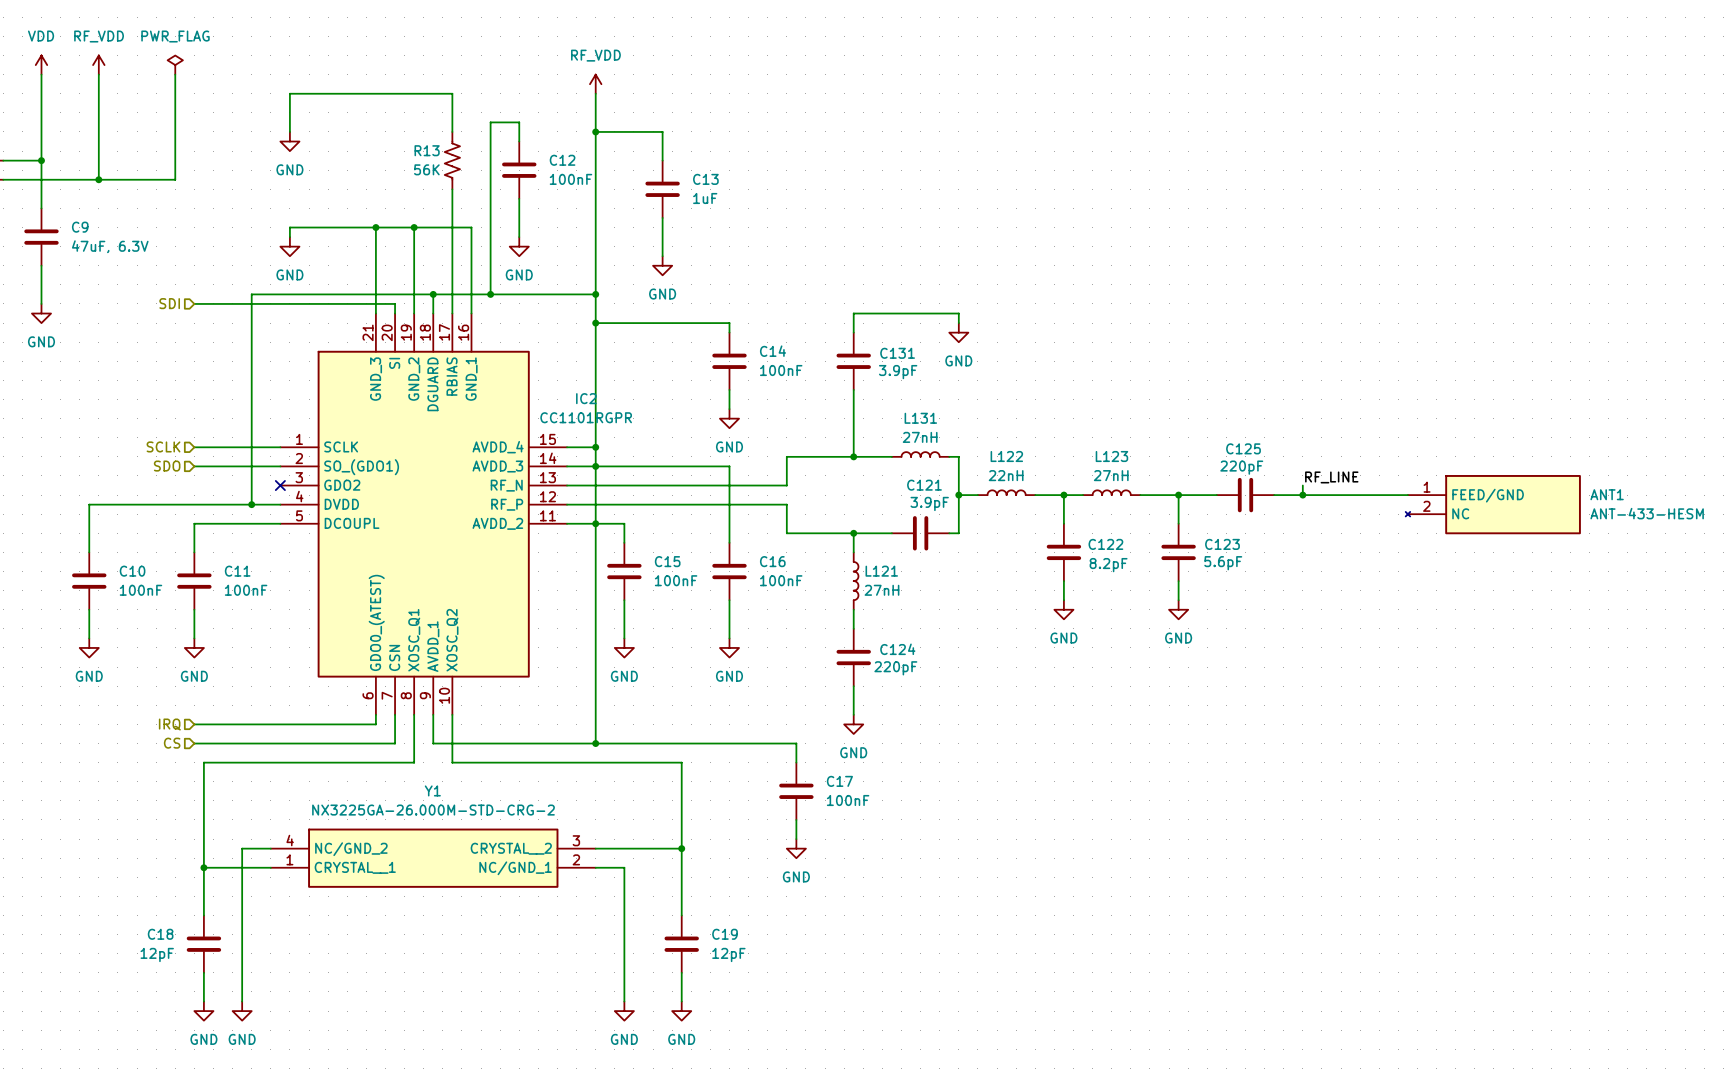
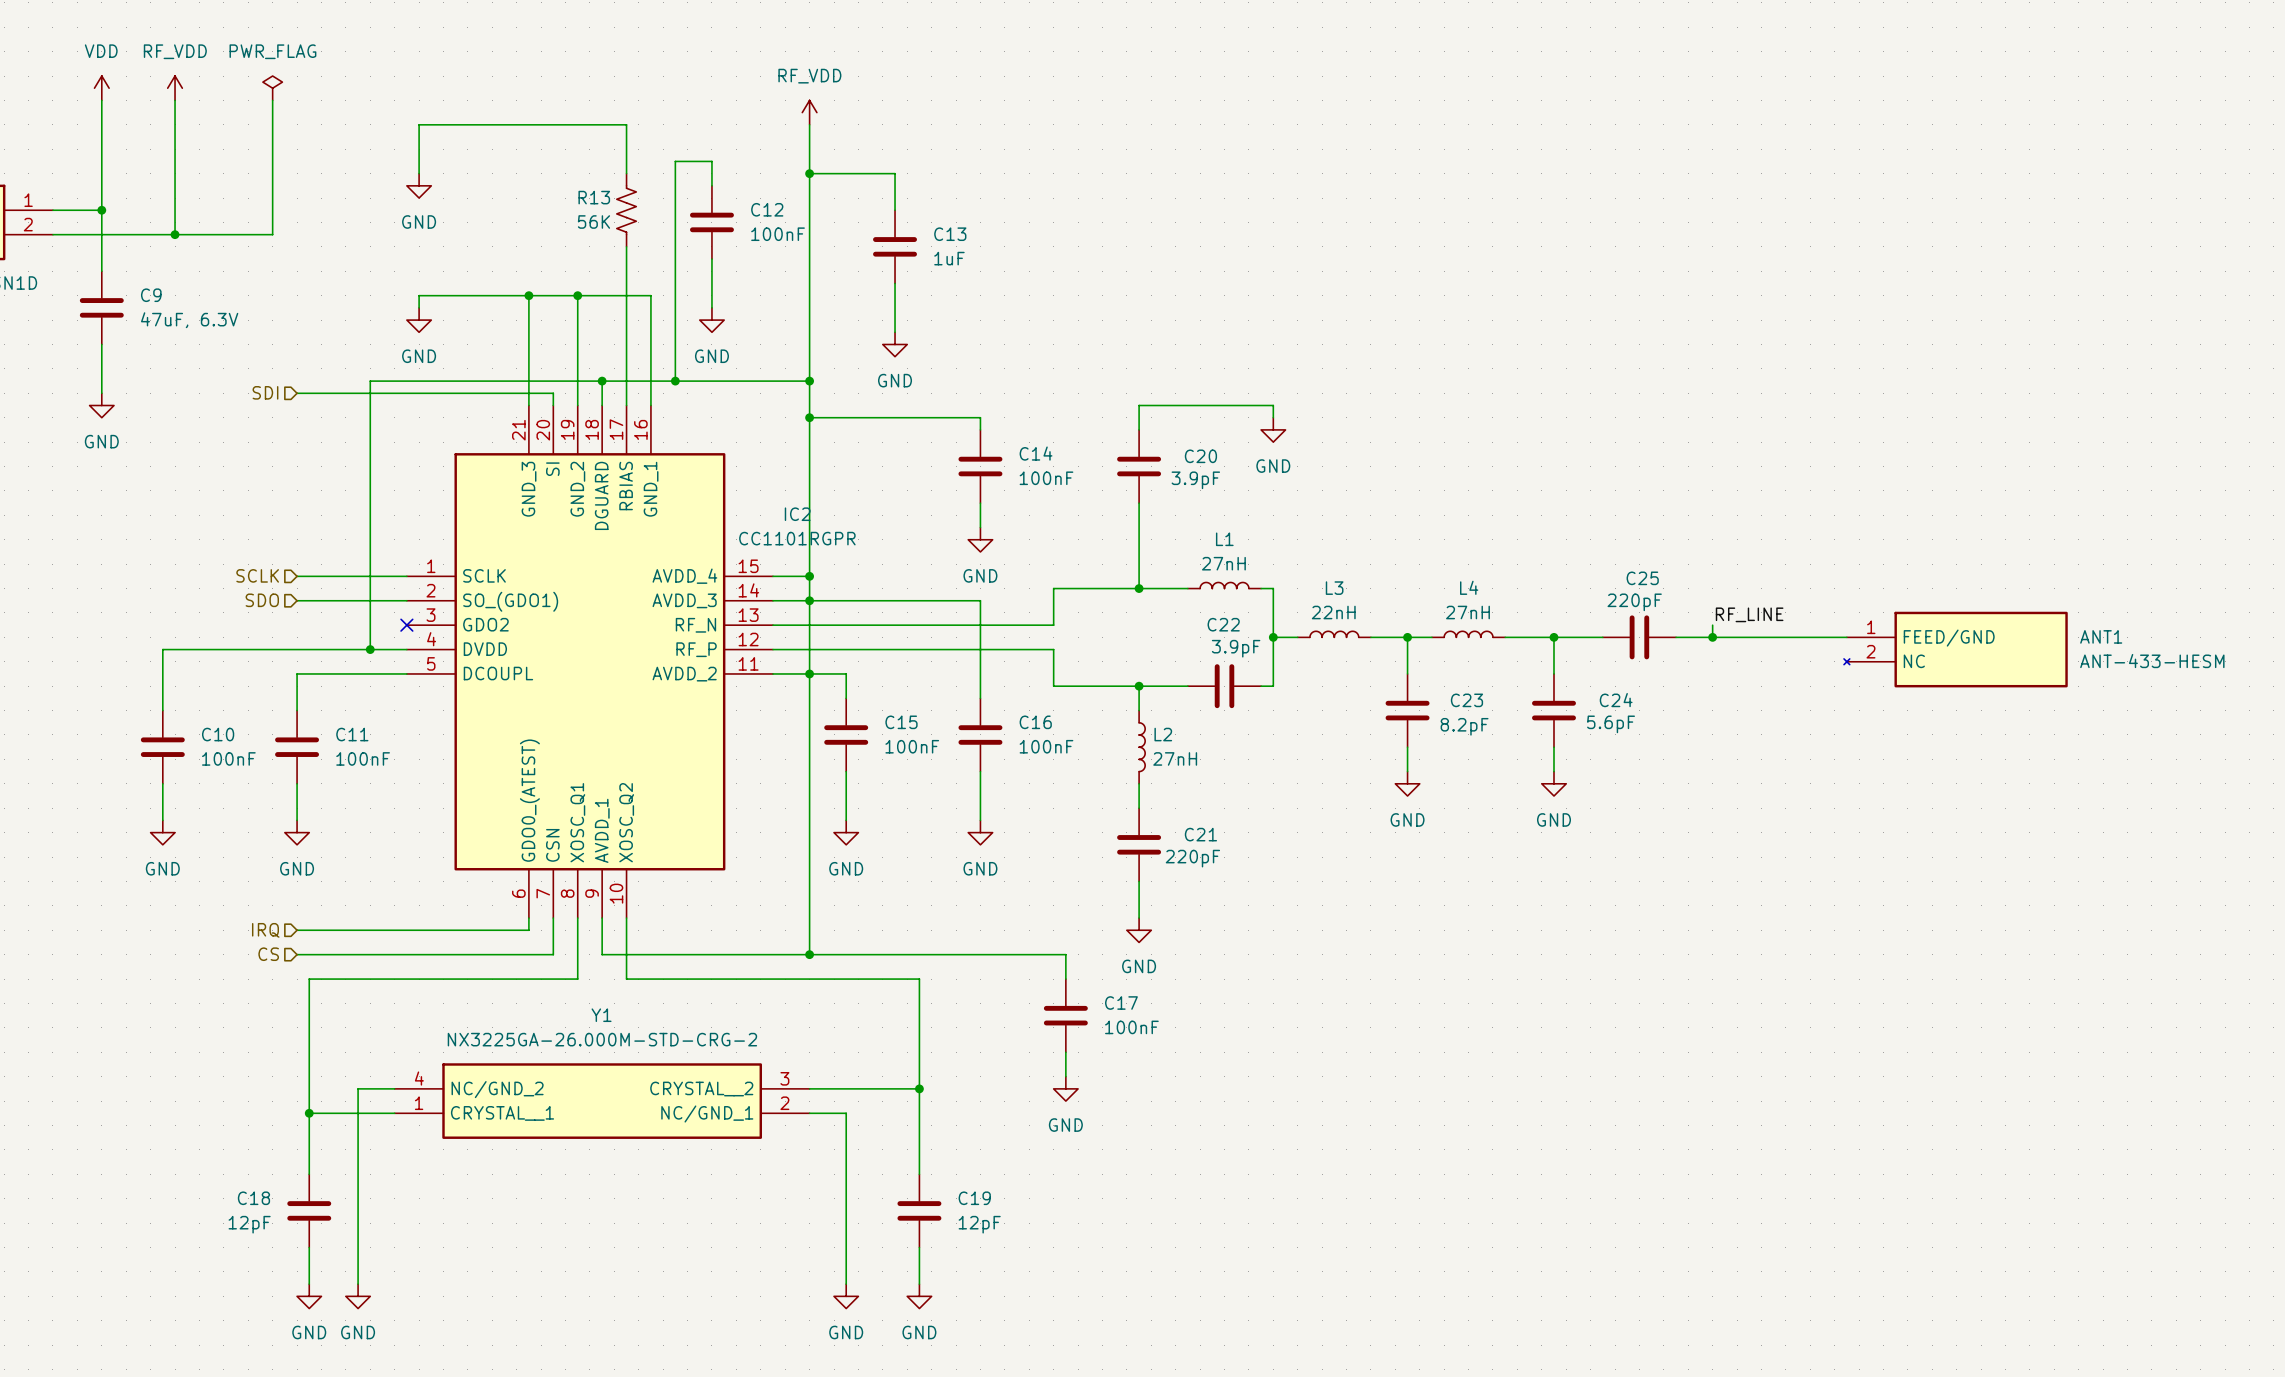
C131 name: C131 (897, 353) -> C20 (1200, 456)
L131 name: L131 (920, 418) -> L1 (1224, 539)
C125 name: C125 (1243, 448) -> C25 (1642, 578)
L122 name: L122 (1006, 456) -> L3 (1334, 588)
L123 name: L123 (1111, 456) -> L4 (1469, 587)
C121 name: C121 (924, 485) -> C22 (1223, 624)
C122 name: C122 (1105, 544) -> C23 (1466, 700)
C123 name: C123 (1222, 544) -> C24 (1616, 700)
L121 name: L121 (881, 571) -> L2 (1163, 734)
C124 name: C124 (897, 649) -> C21 (1200, 834)

